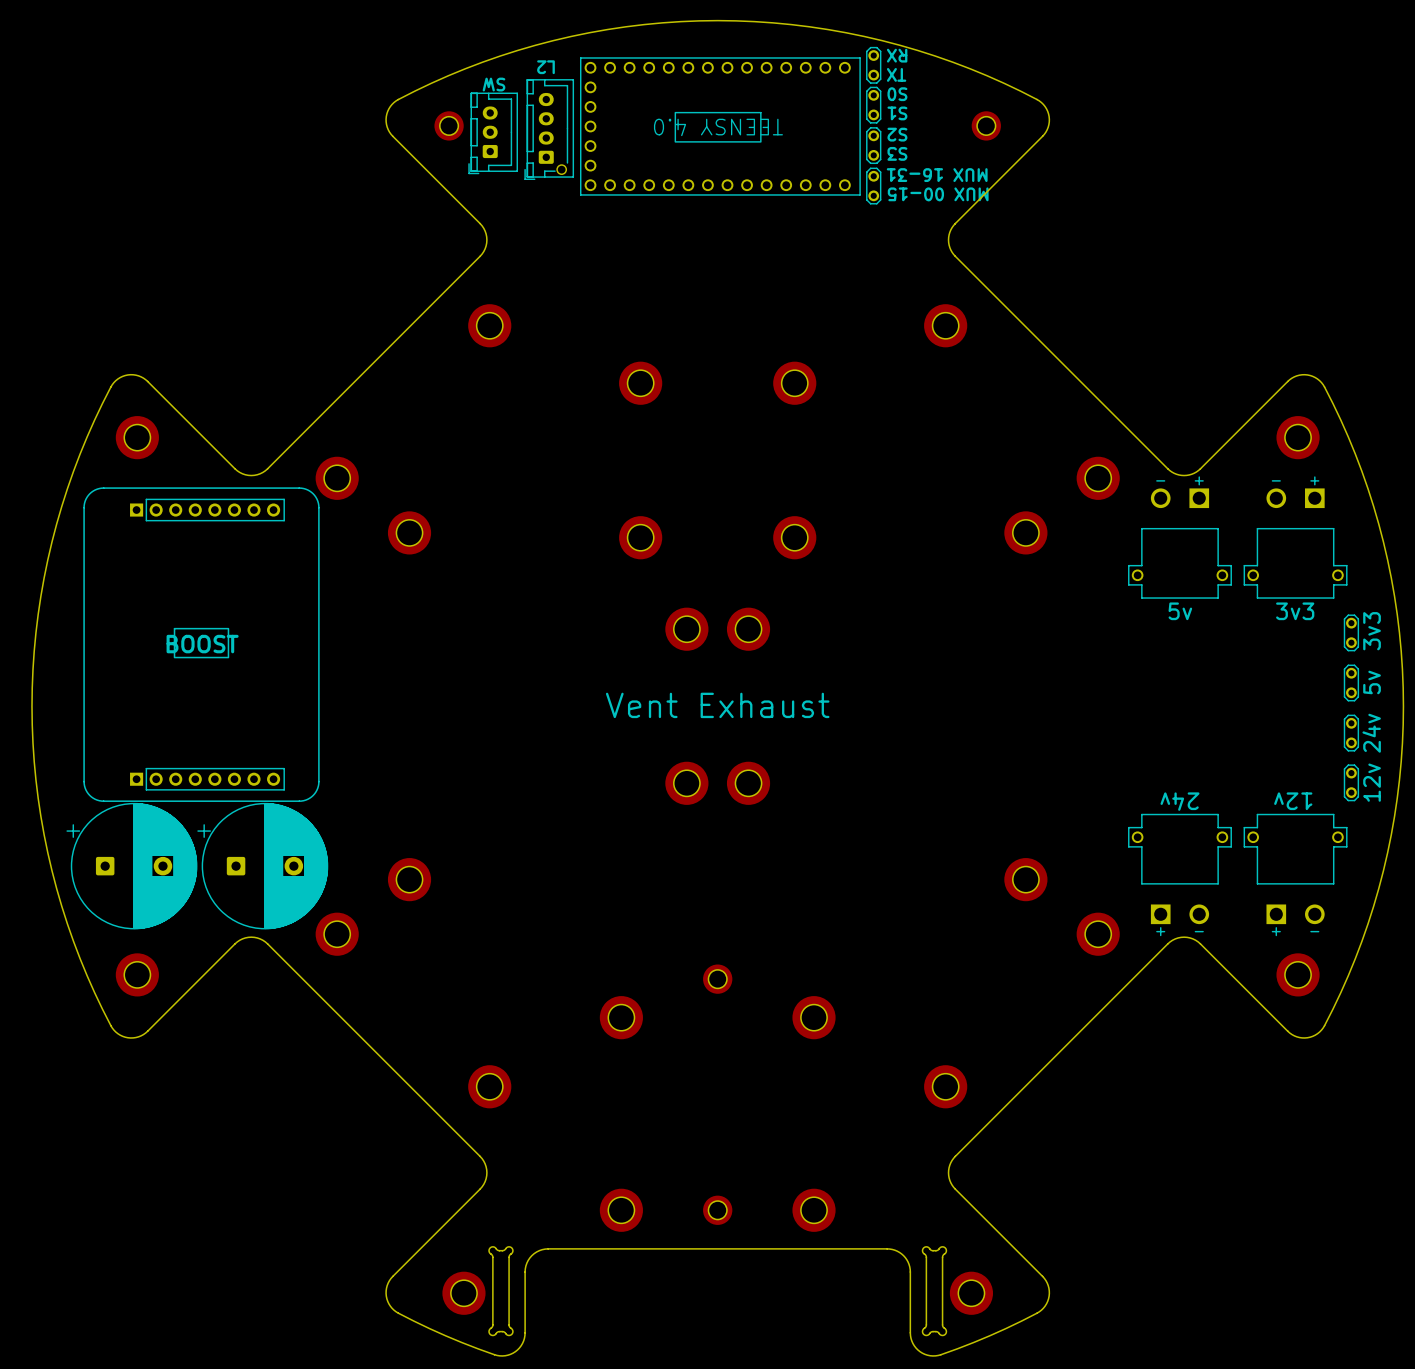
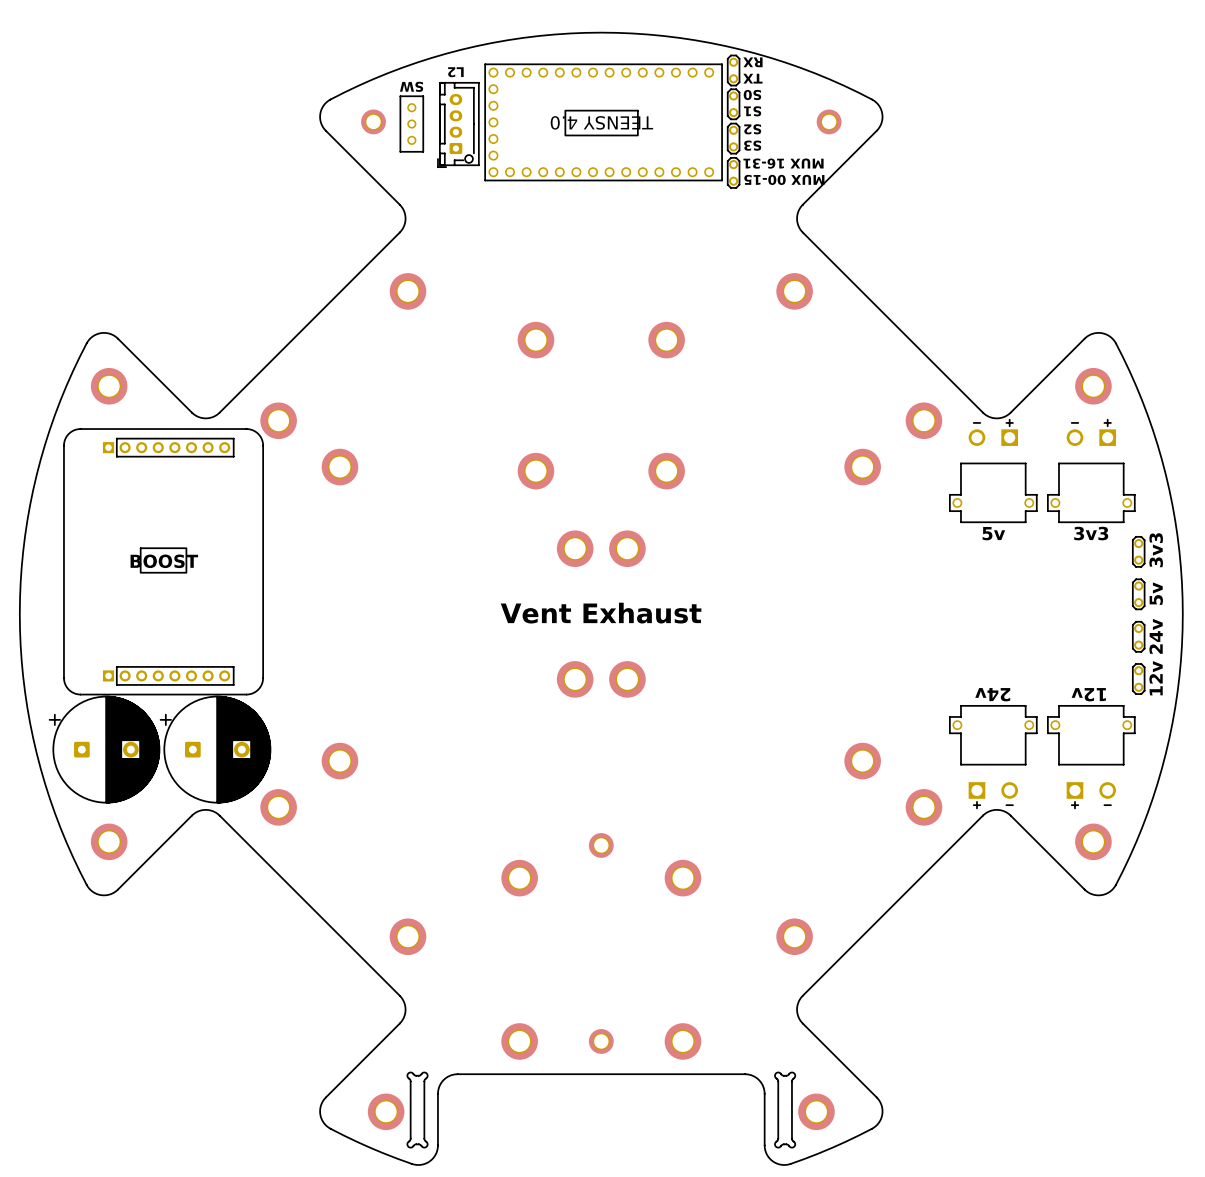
part footprint: [468, 92, 518, 174] -> [400, 95, 424, 153]

